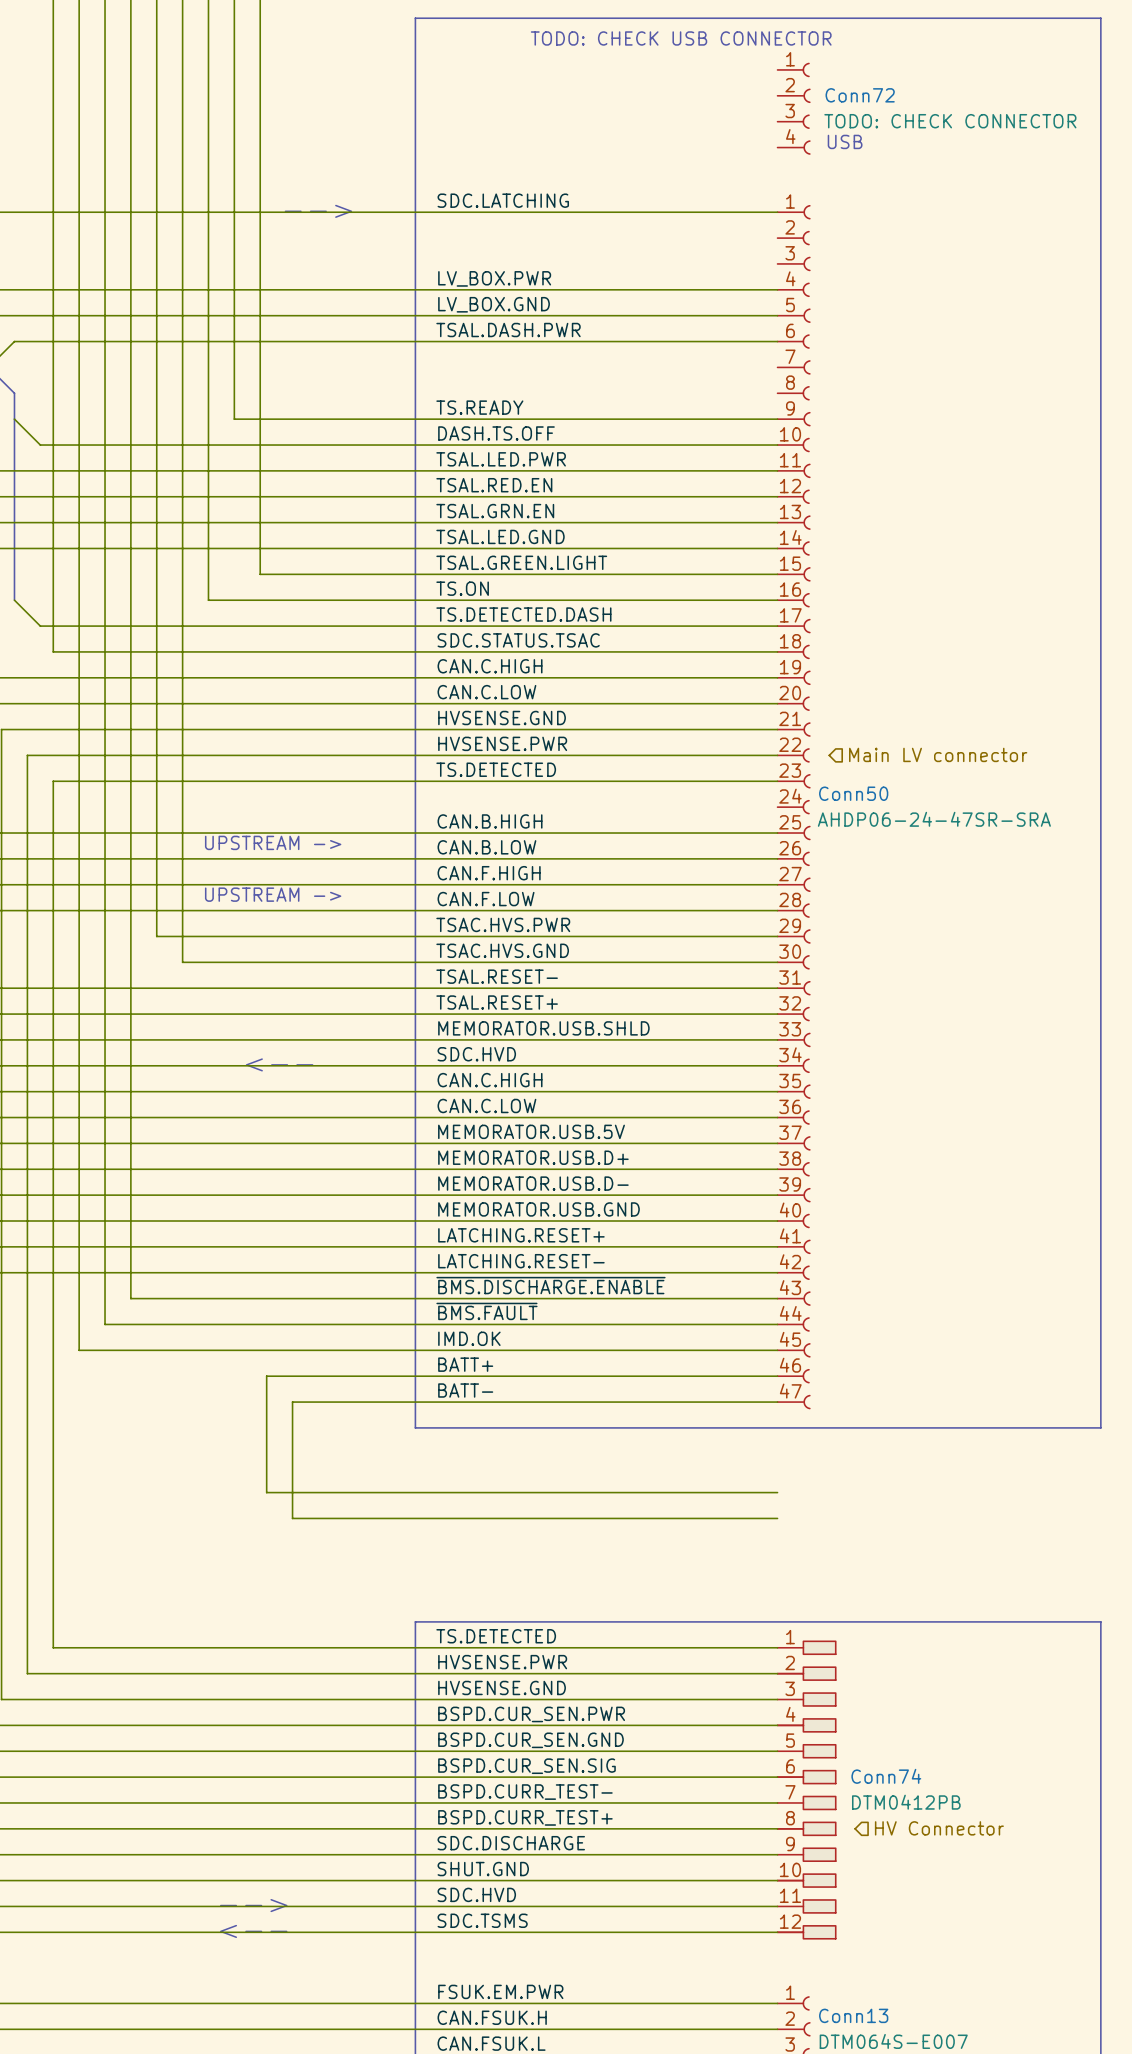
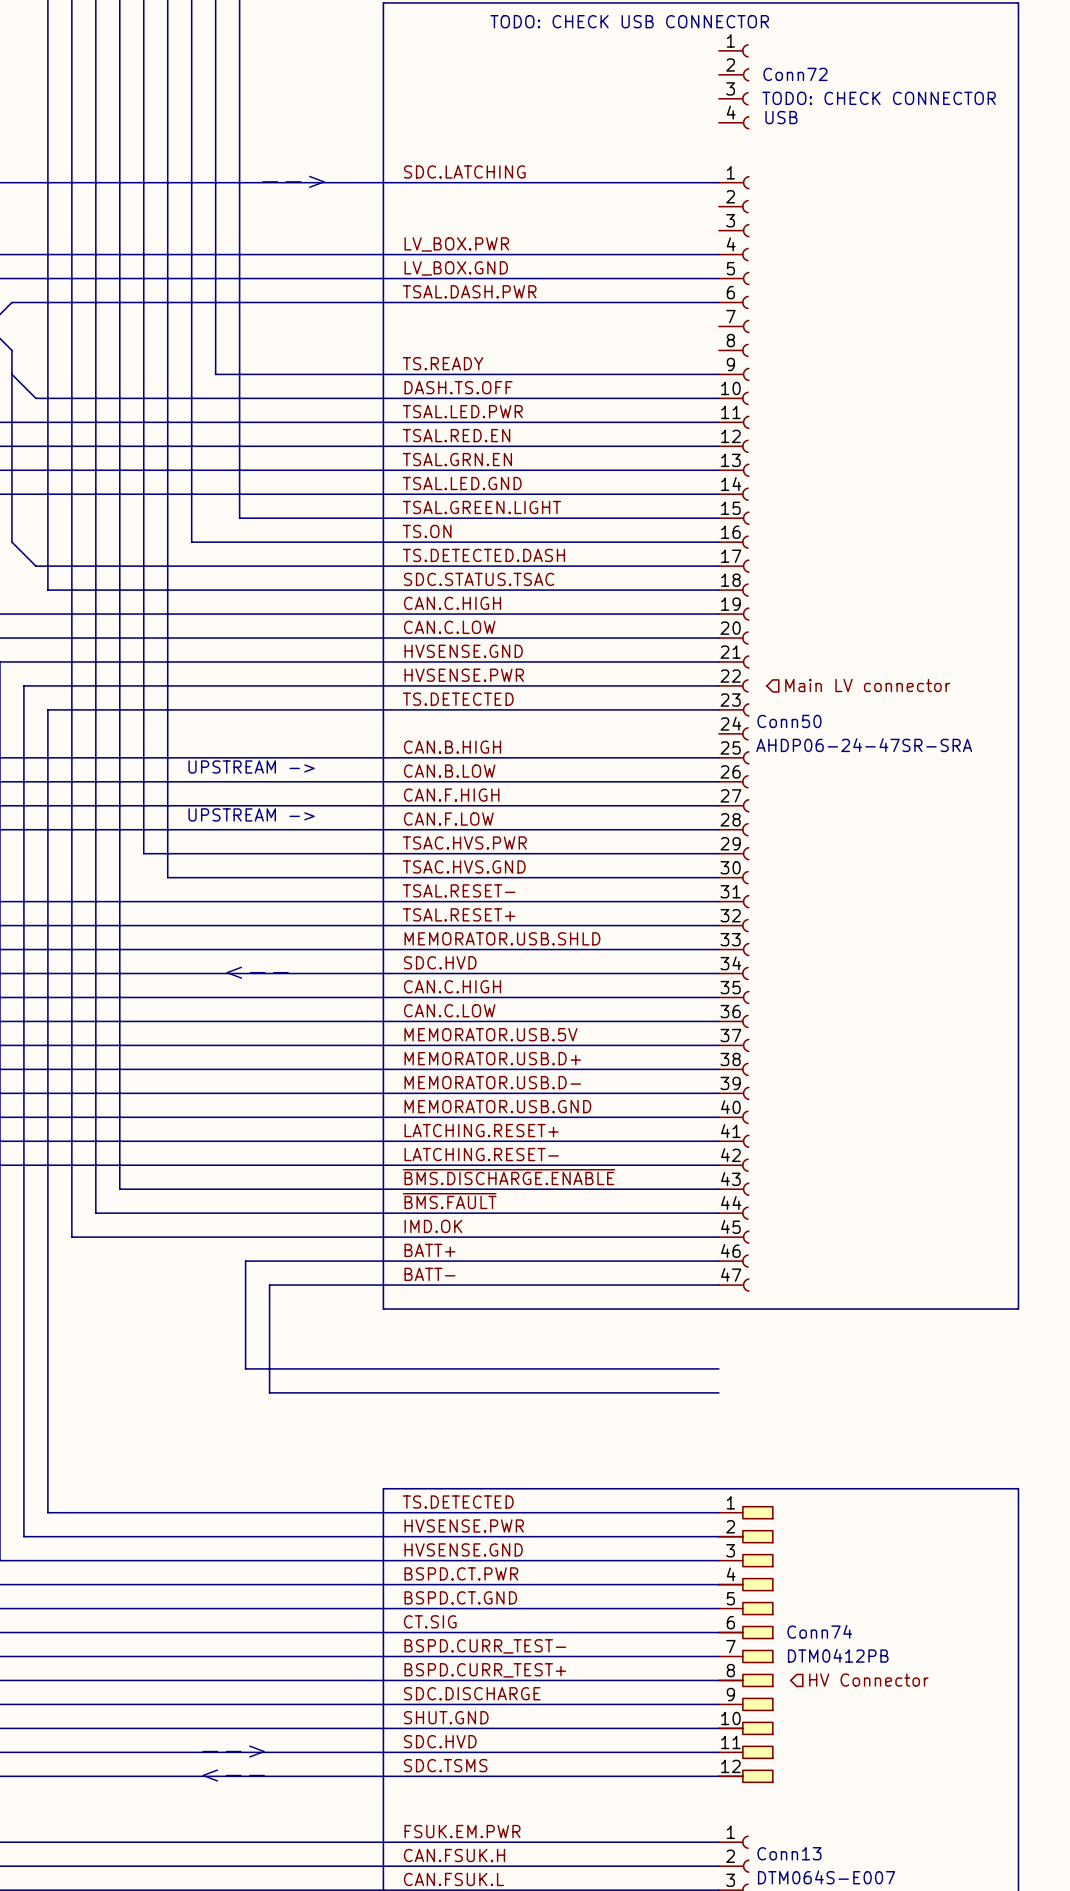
label: BSPD.CUR_SEN.PWR (531, 1714) -> BSPD.CT.PWR (461, 1573)
label: BSPD.CUR_SEN.GND (530, 1740) -> BSPD.CT.GND (460, 1597)
label: BSPD.CUR_SEN.SIG (526, 1766) -> CT.SIG (430, 1621)

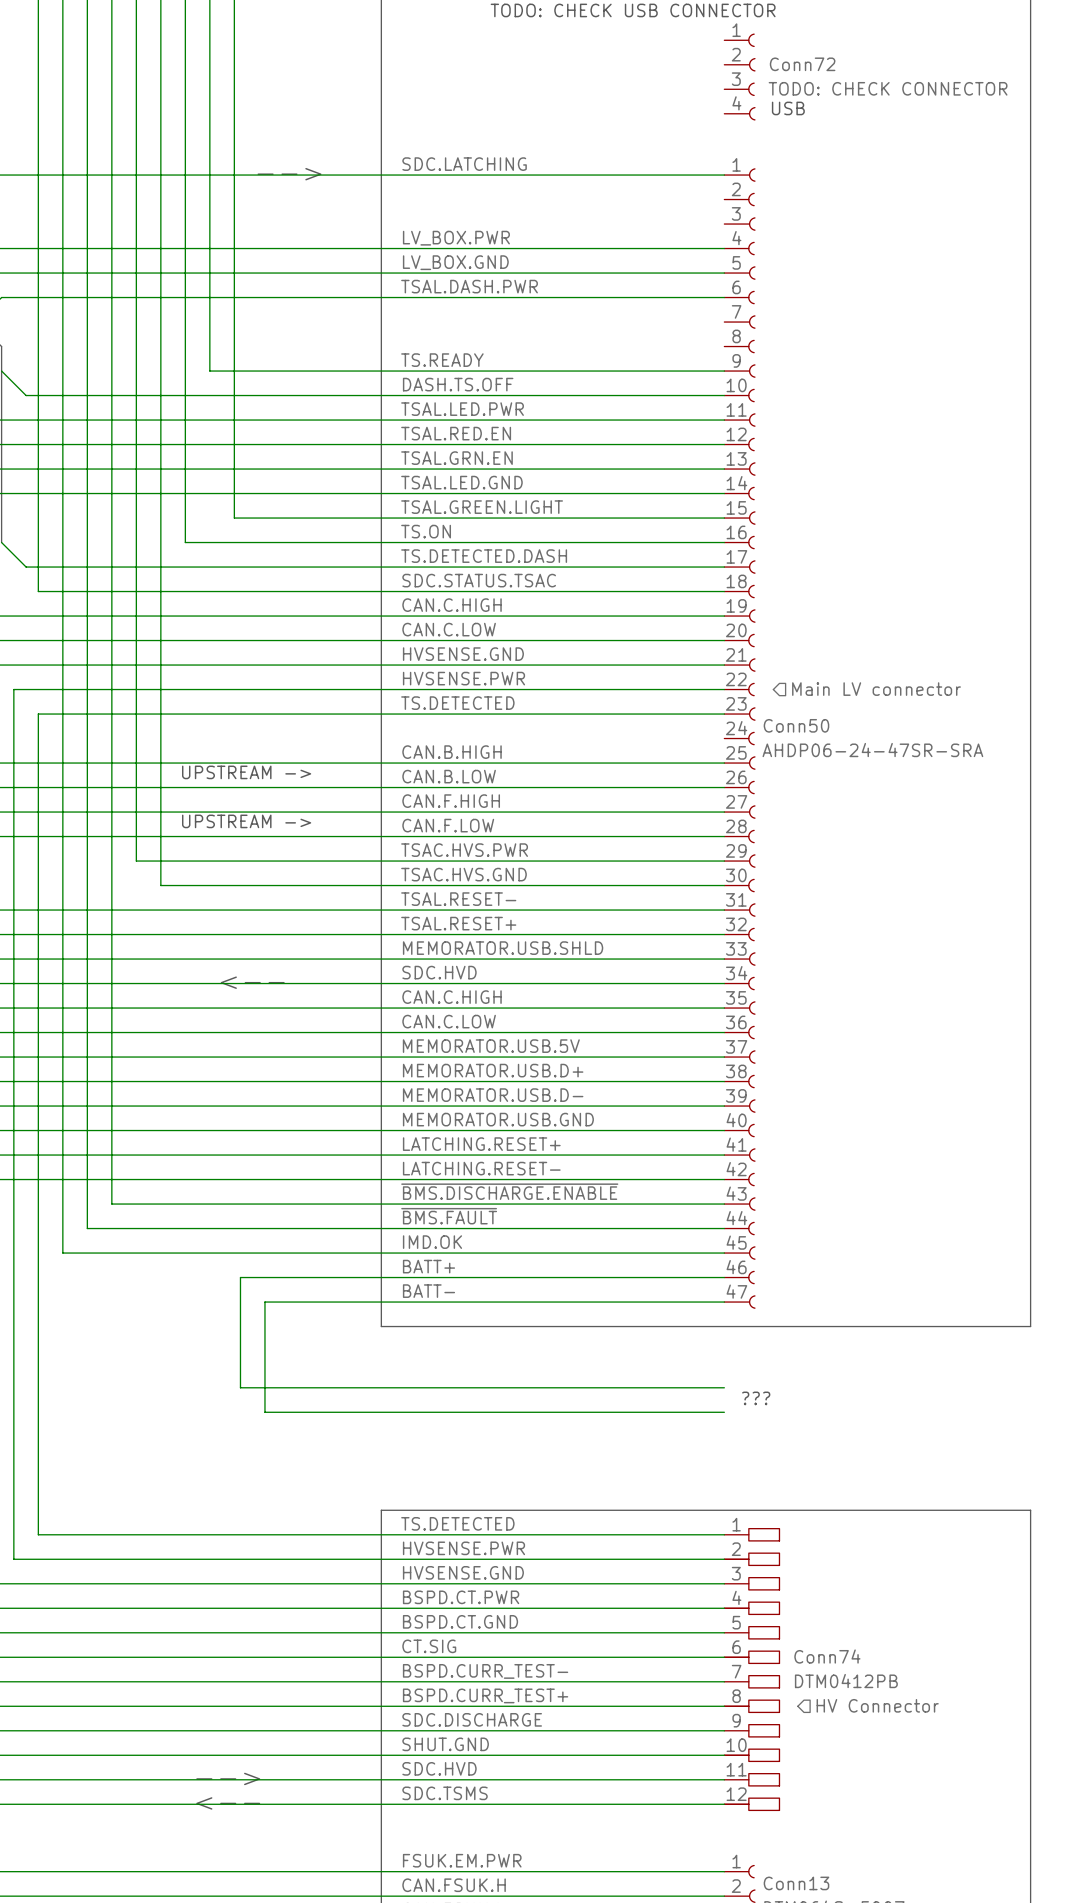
text: none -> ??? (756, 1398)

